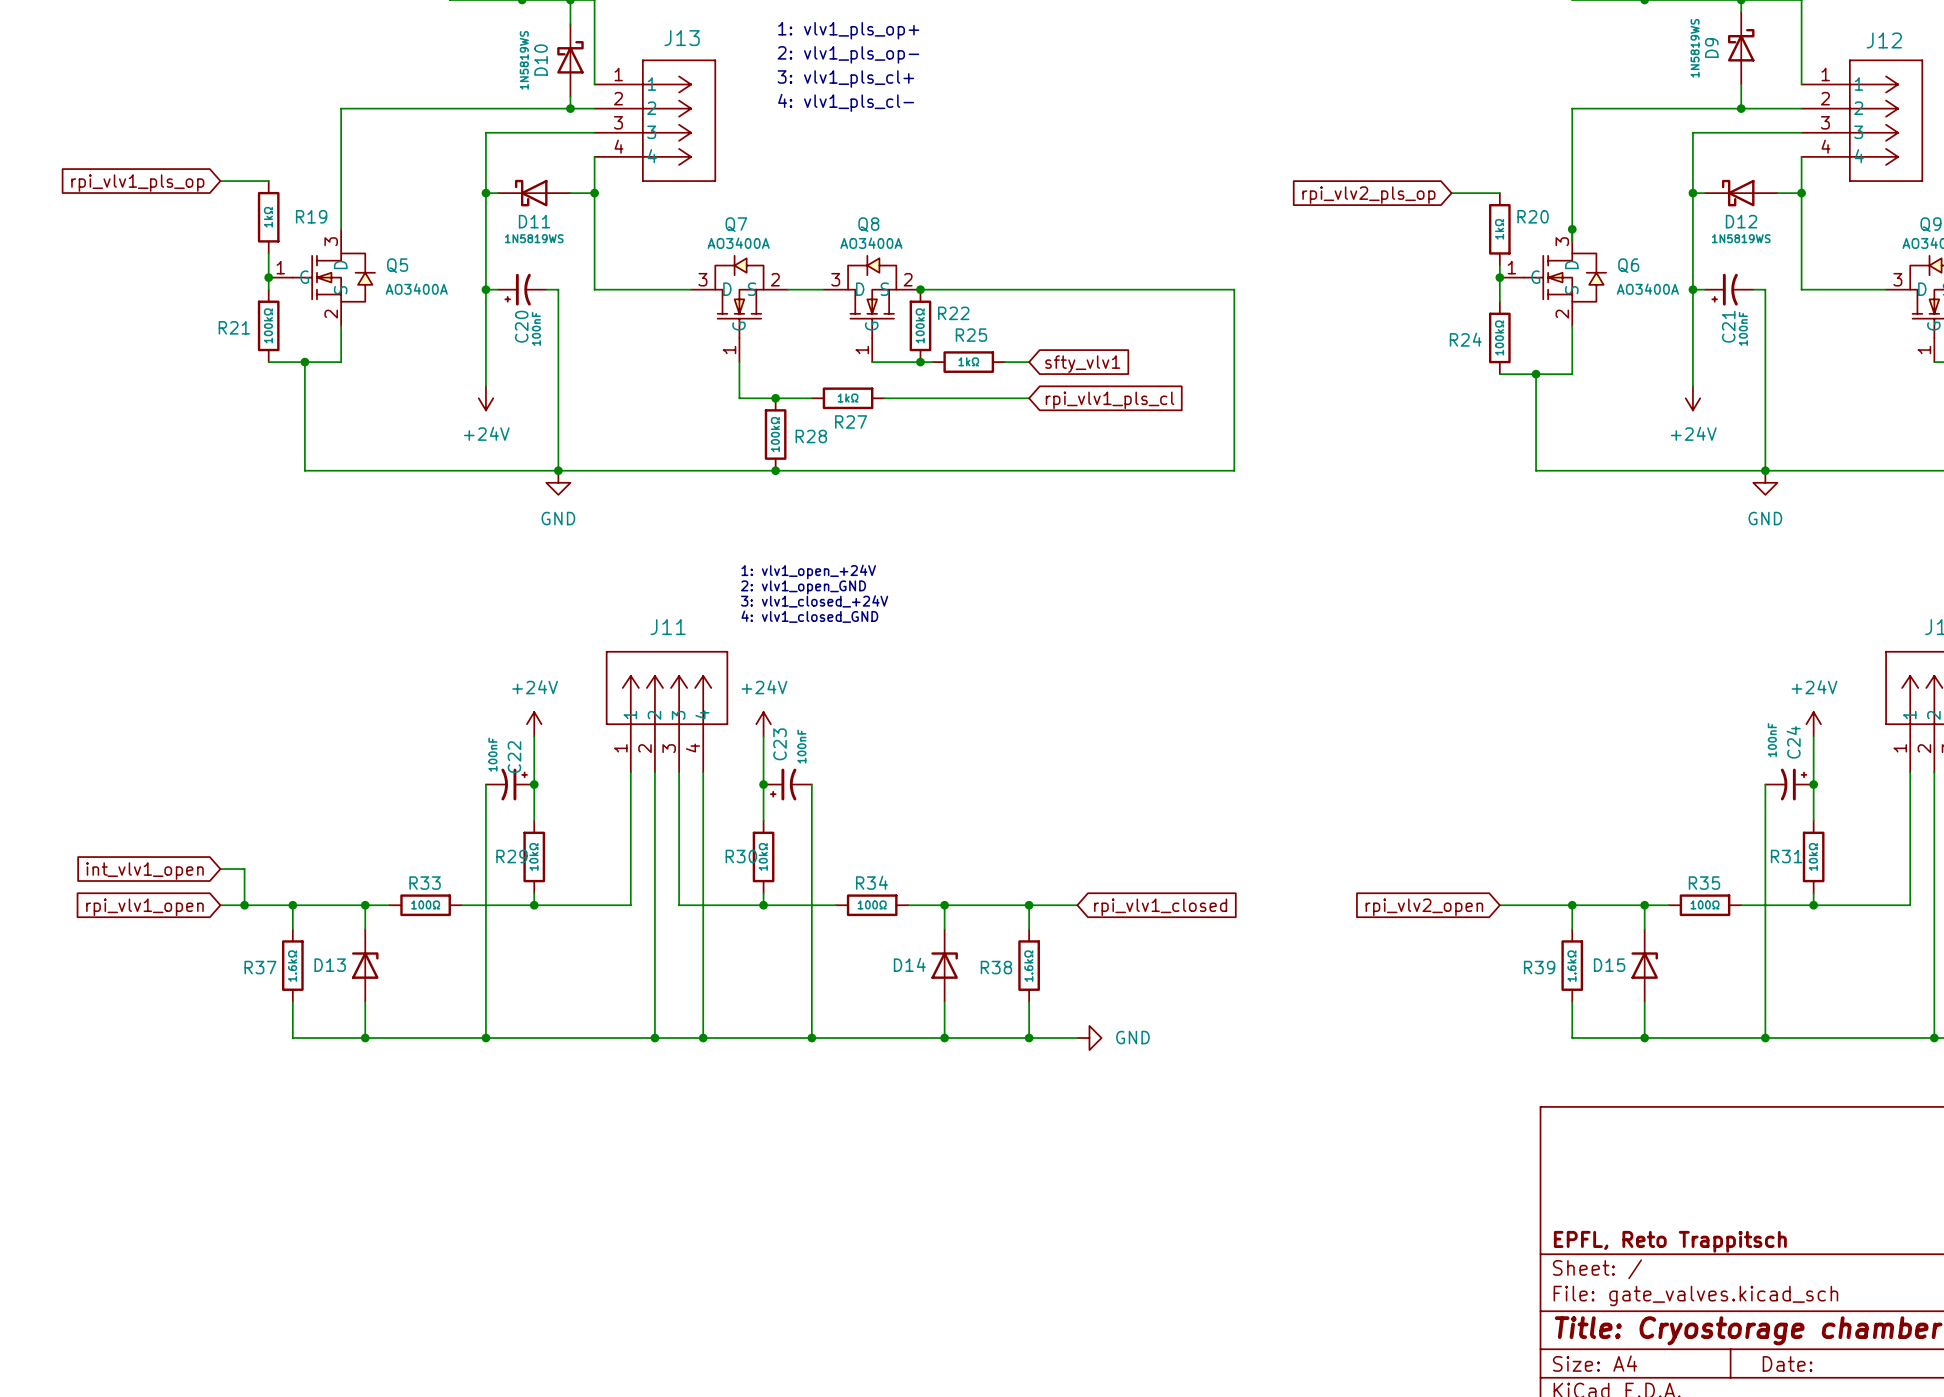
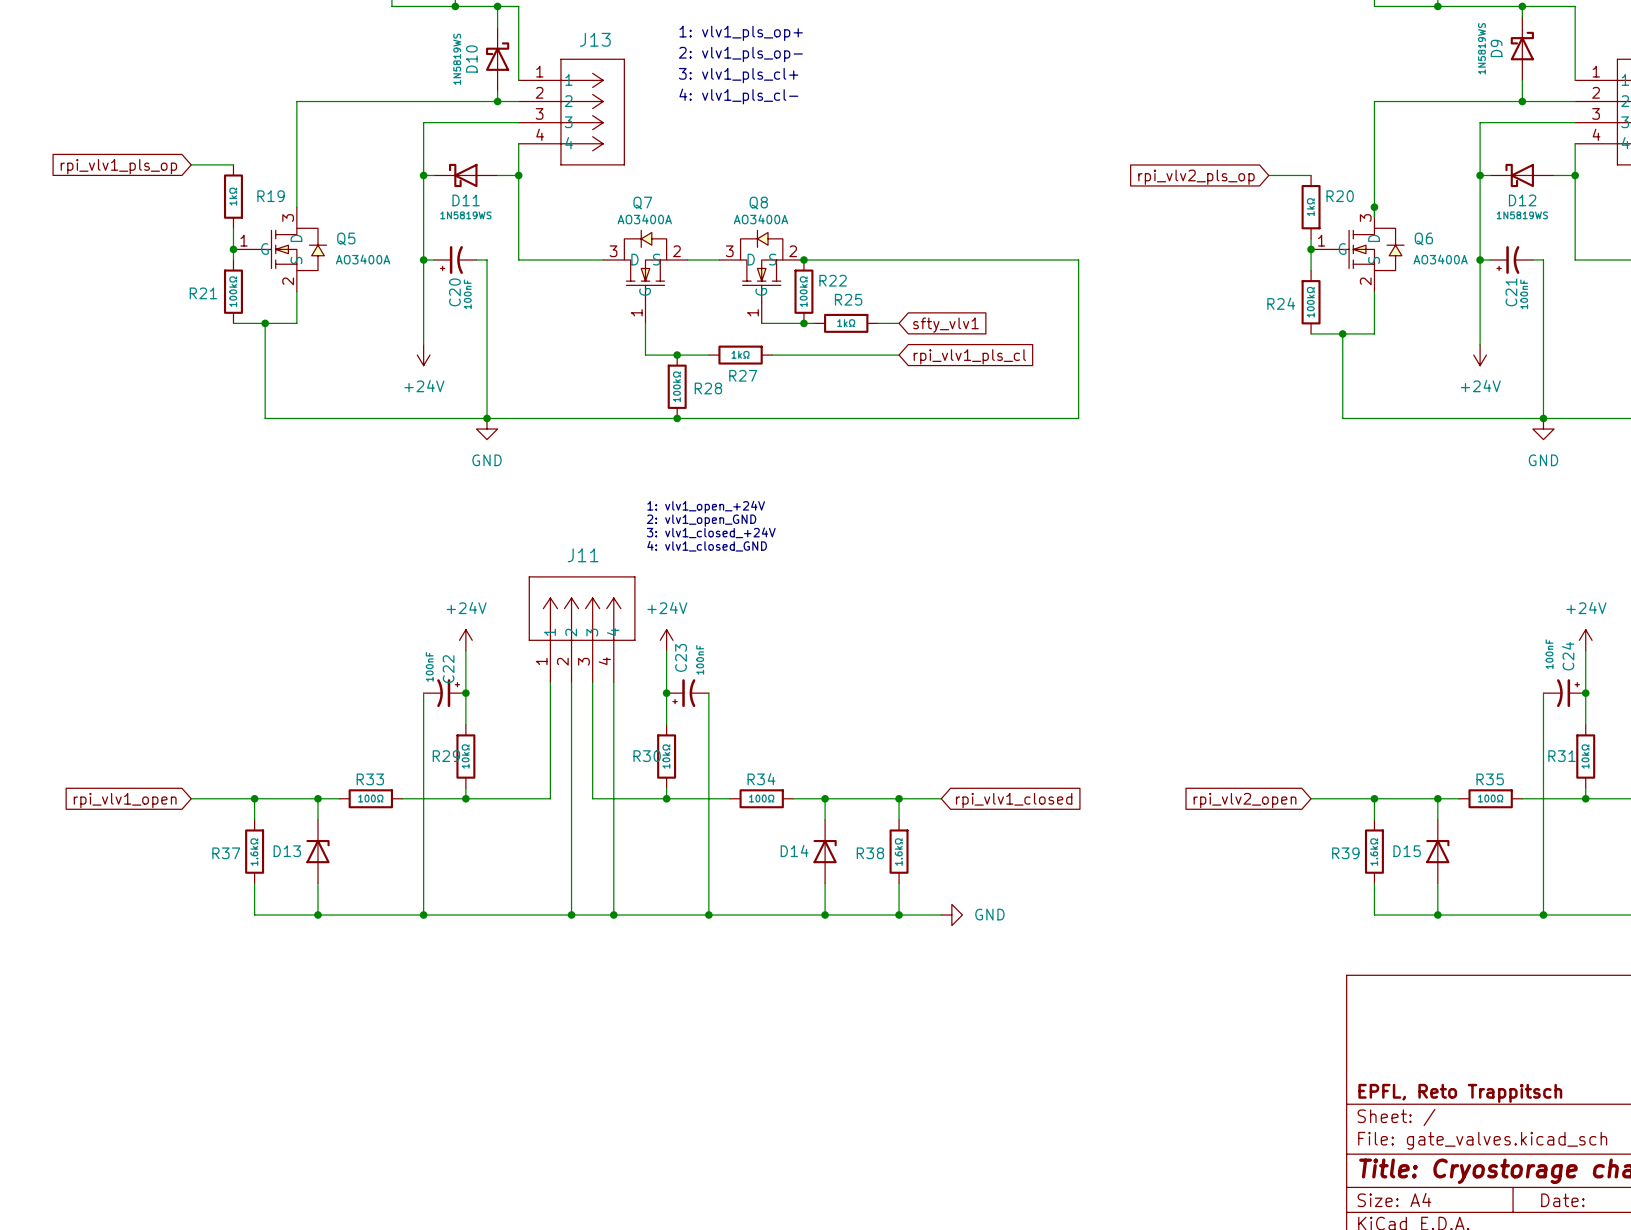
wire: (220, 869) (244, 869) (244, 905) -> none
global label: int_vlv1_open (144, 871) -> none
junction: (244, 905) -> none

